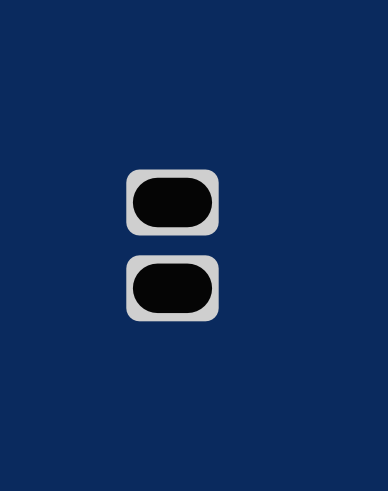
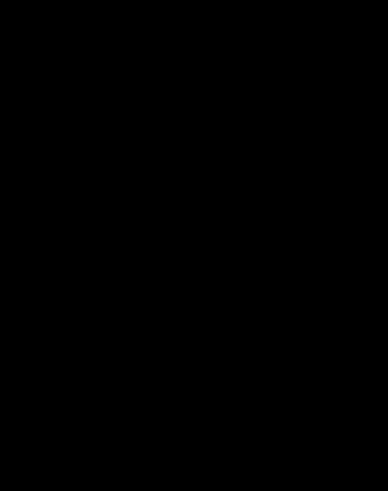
part: (172, 245) -> none

